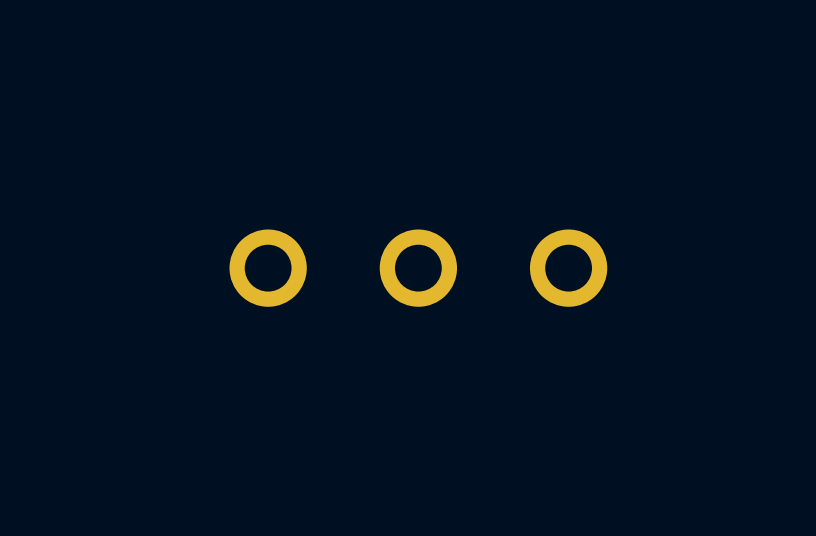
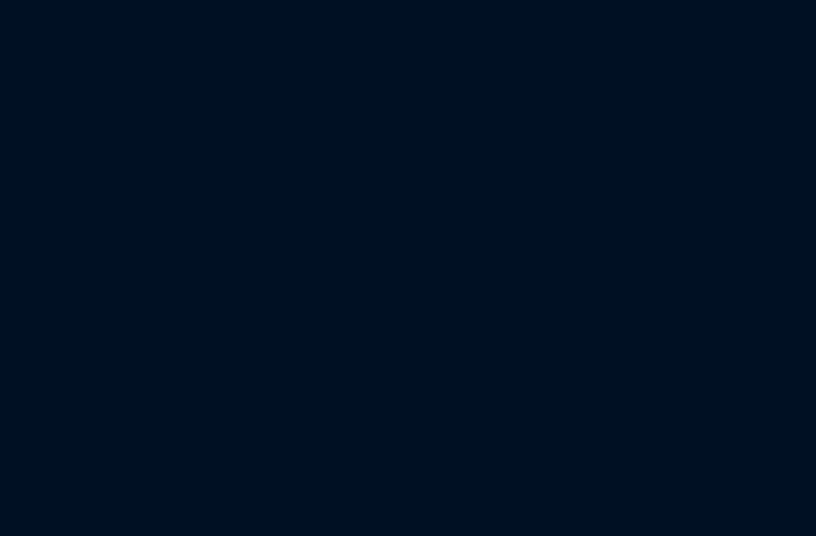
part: (418, 268) -> none

